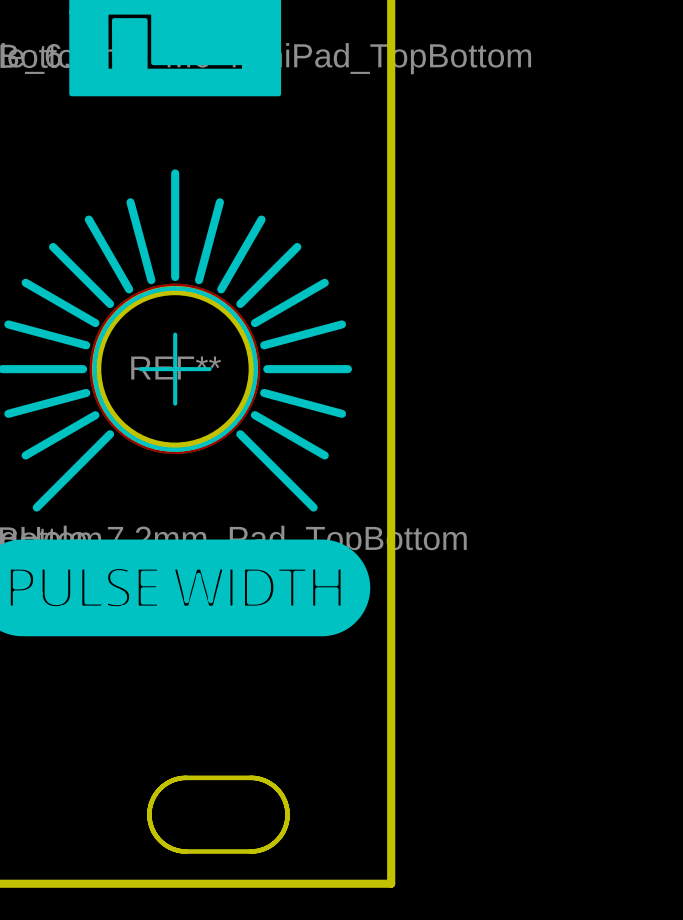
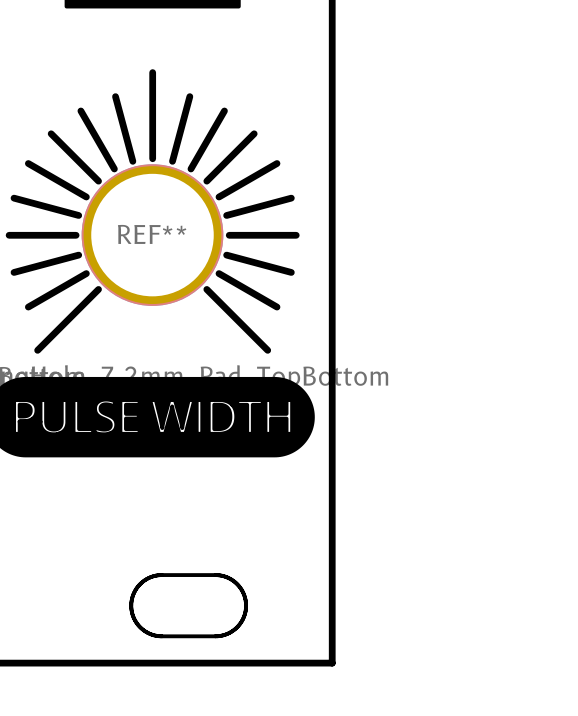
line: (175, 288) (191, 290) (206, 294) (232, 312) (249, 337) (254, 352) (255, 369) (254, 385) (249, 400) (232, 426) (206, 443) (191, 448) (175, 449) (158, 448) (143, 443) (118, 426) (100, 400) (96, 385) (94, 369) (96, 352) (100, 337) (118, 312) (143, 294) (158, 290) (175, 288) -> none
line: (175, 334) (175, 403) -> none
line: (140, 369) (209, 369) -> none

